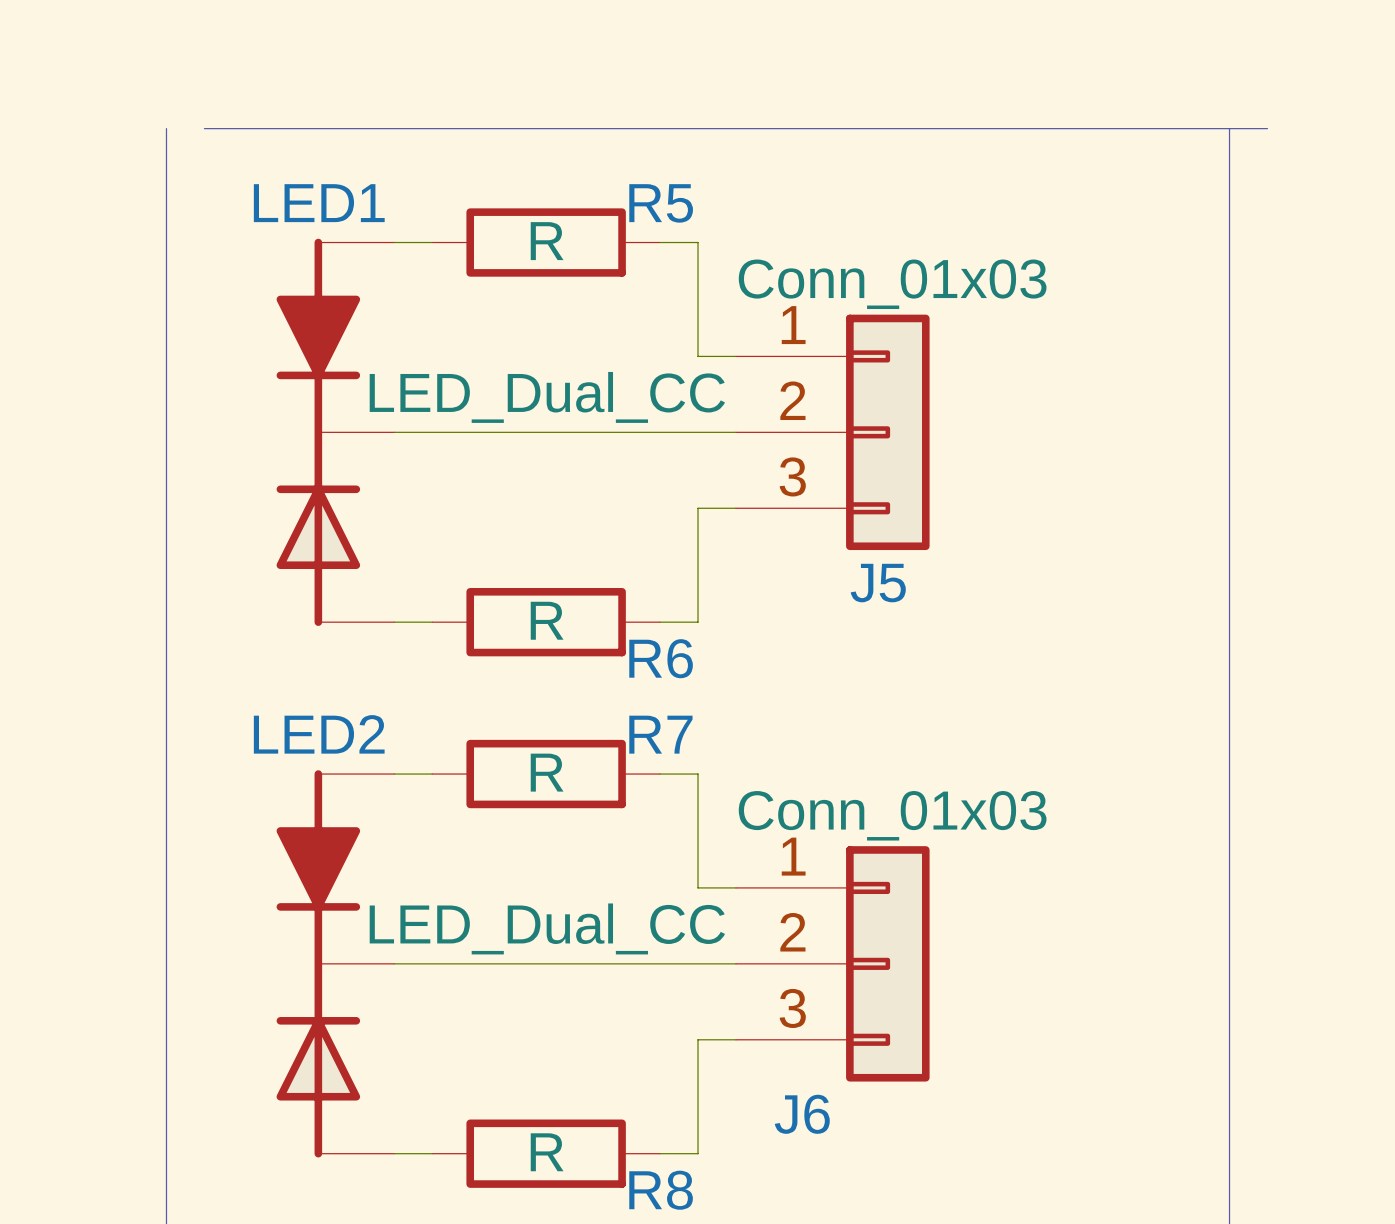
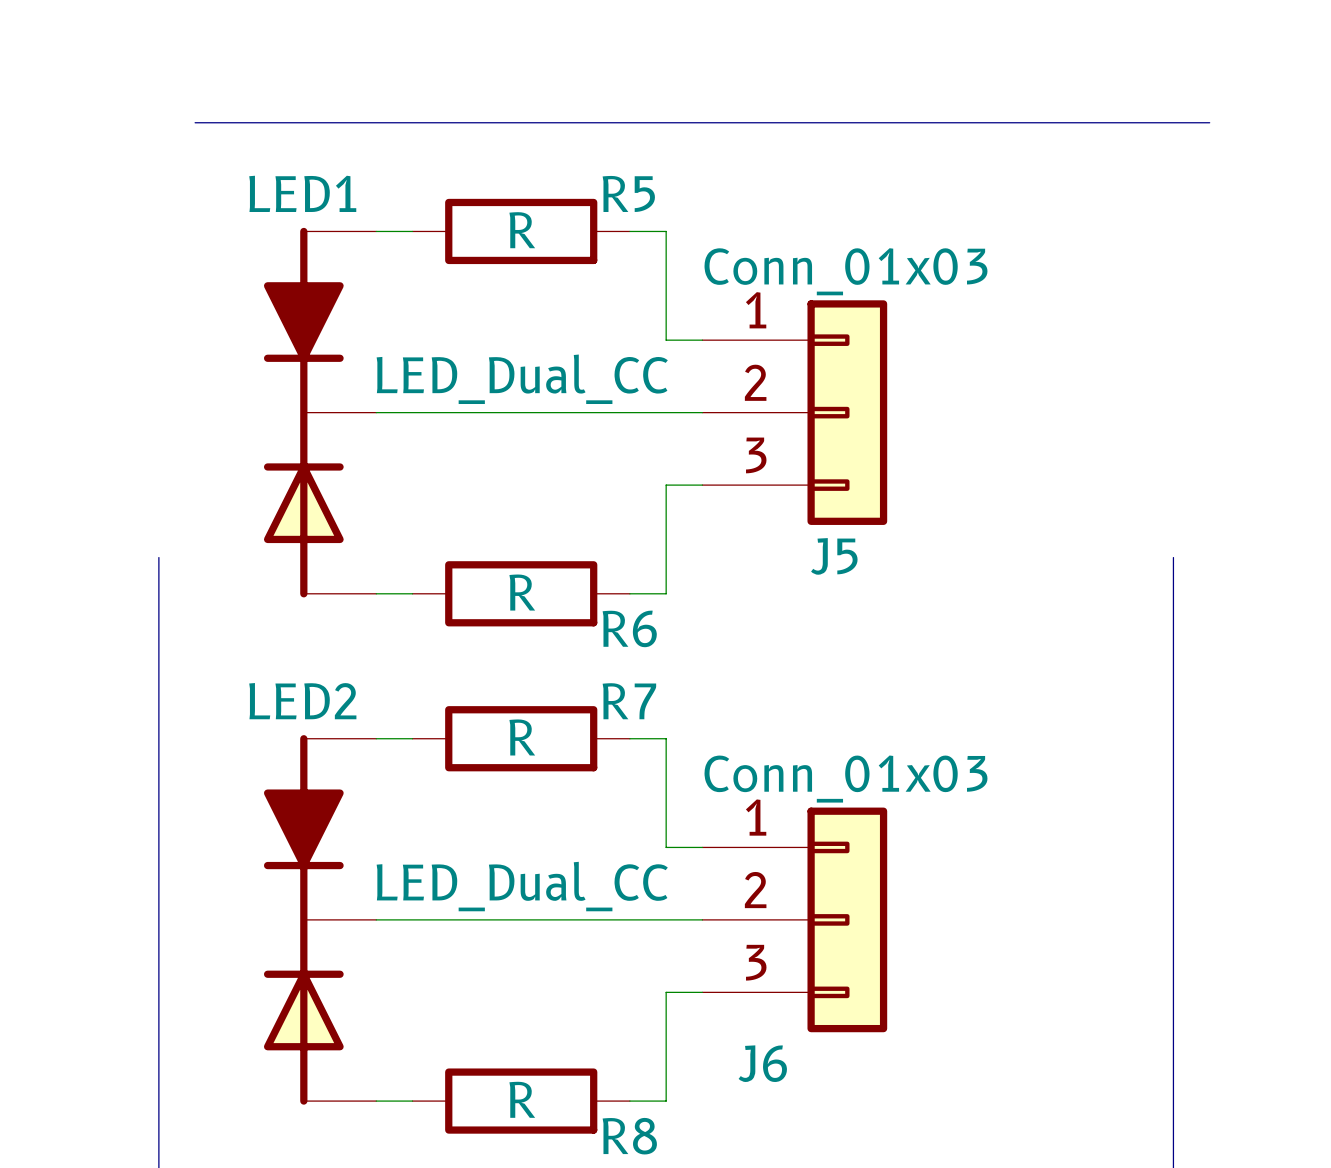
line: (166, 128) (166, 584) -> none
line: (1229, 128) (1229, 584) -> none

